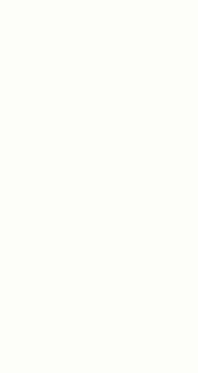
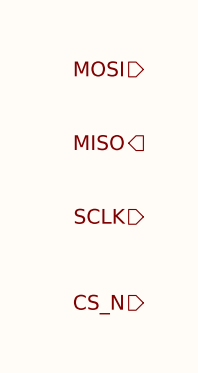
hierarchical label: none -> MOSI (98, 68)
hierarchical label: none -> MISO (99, 142)
hierarchical label: none -> SCLK (100, 216)
hierarchical label: none -> CS_N (98, 304)

